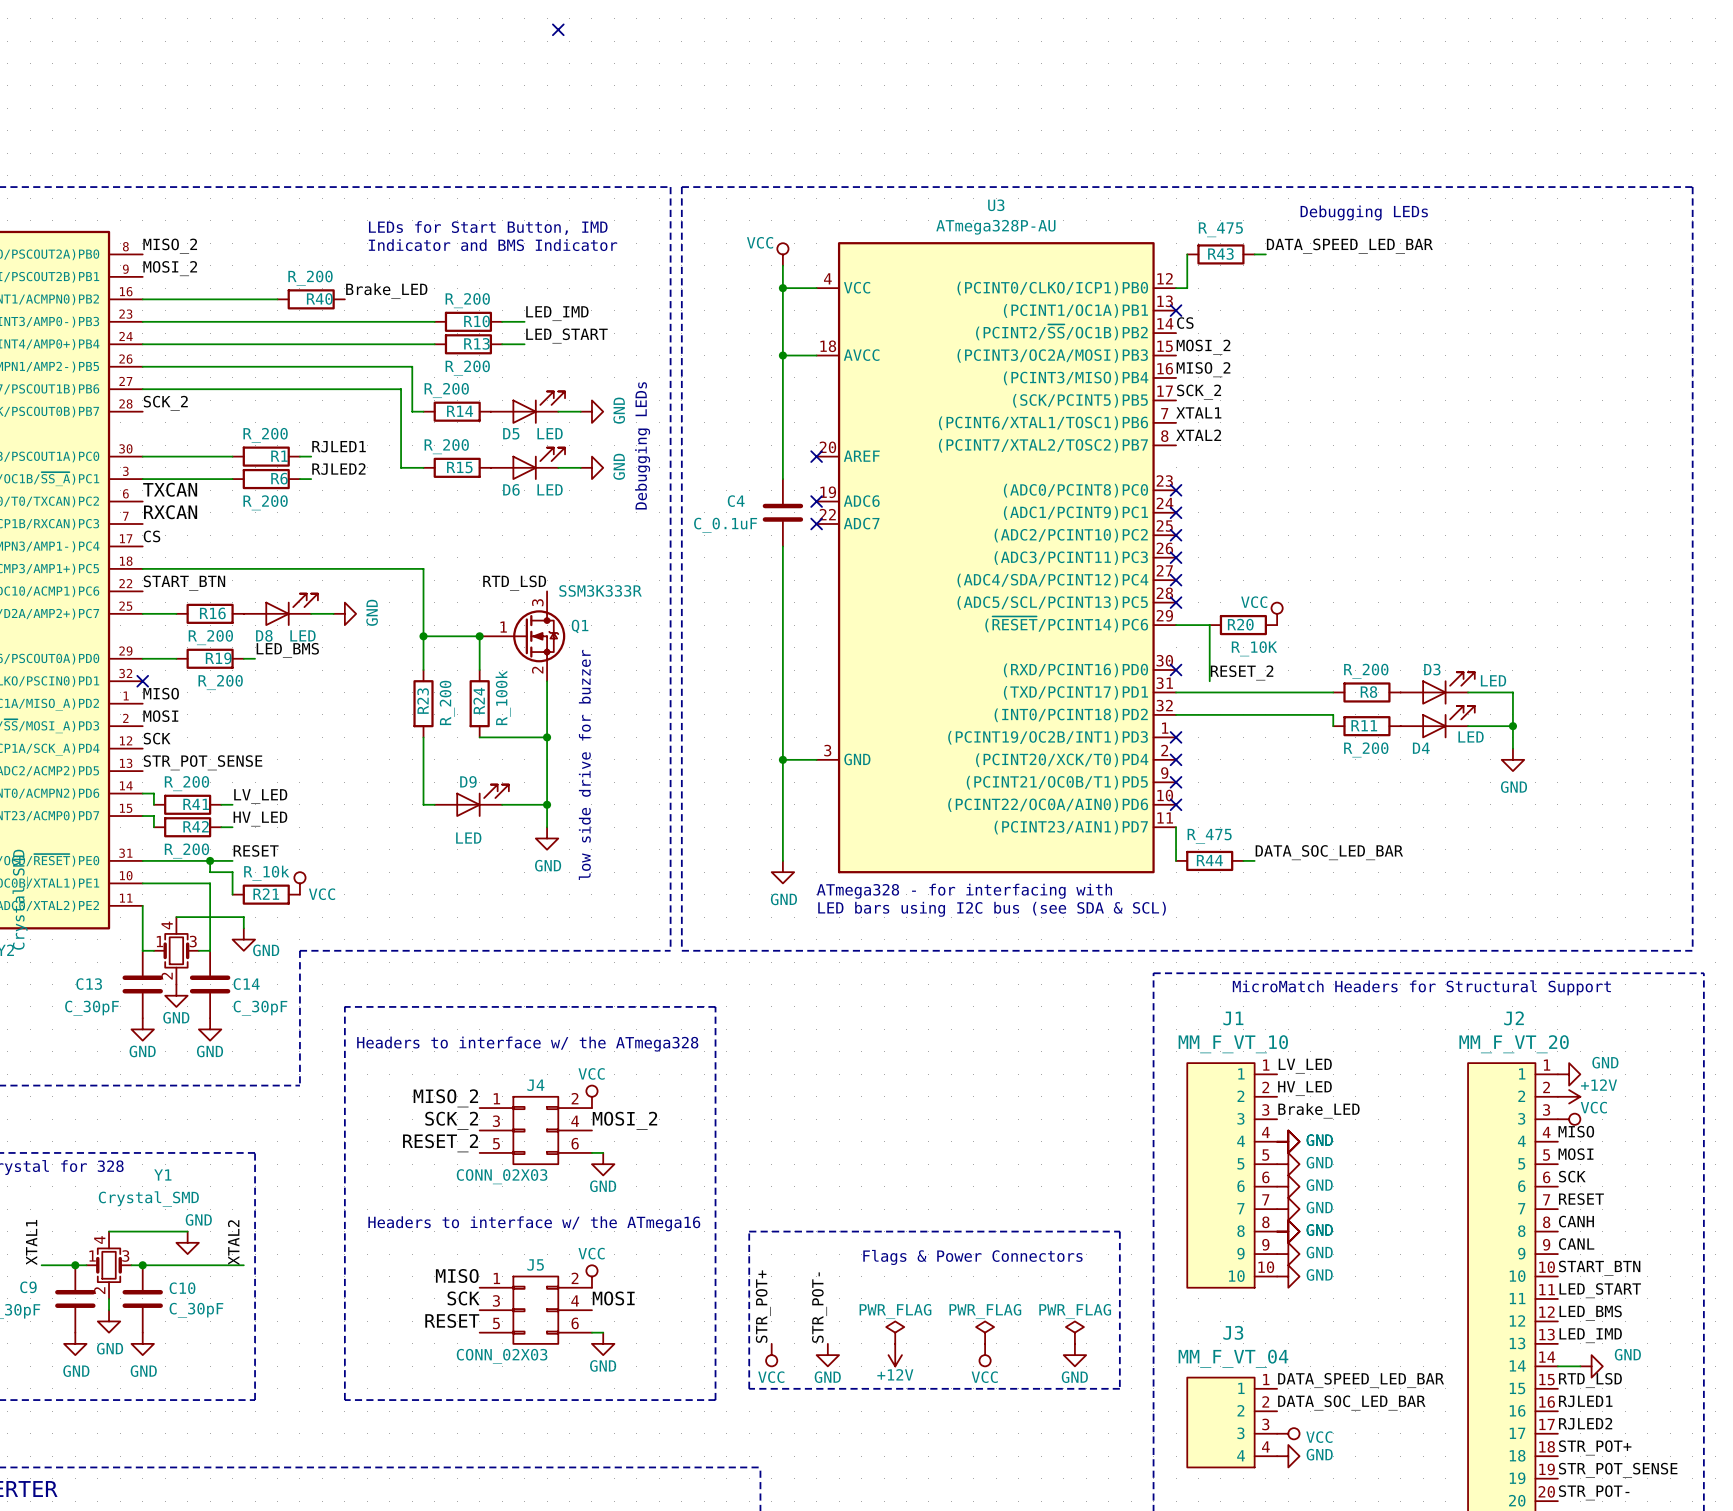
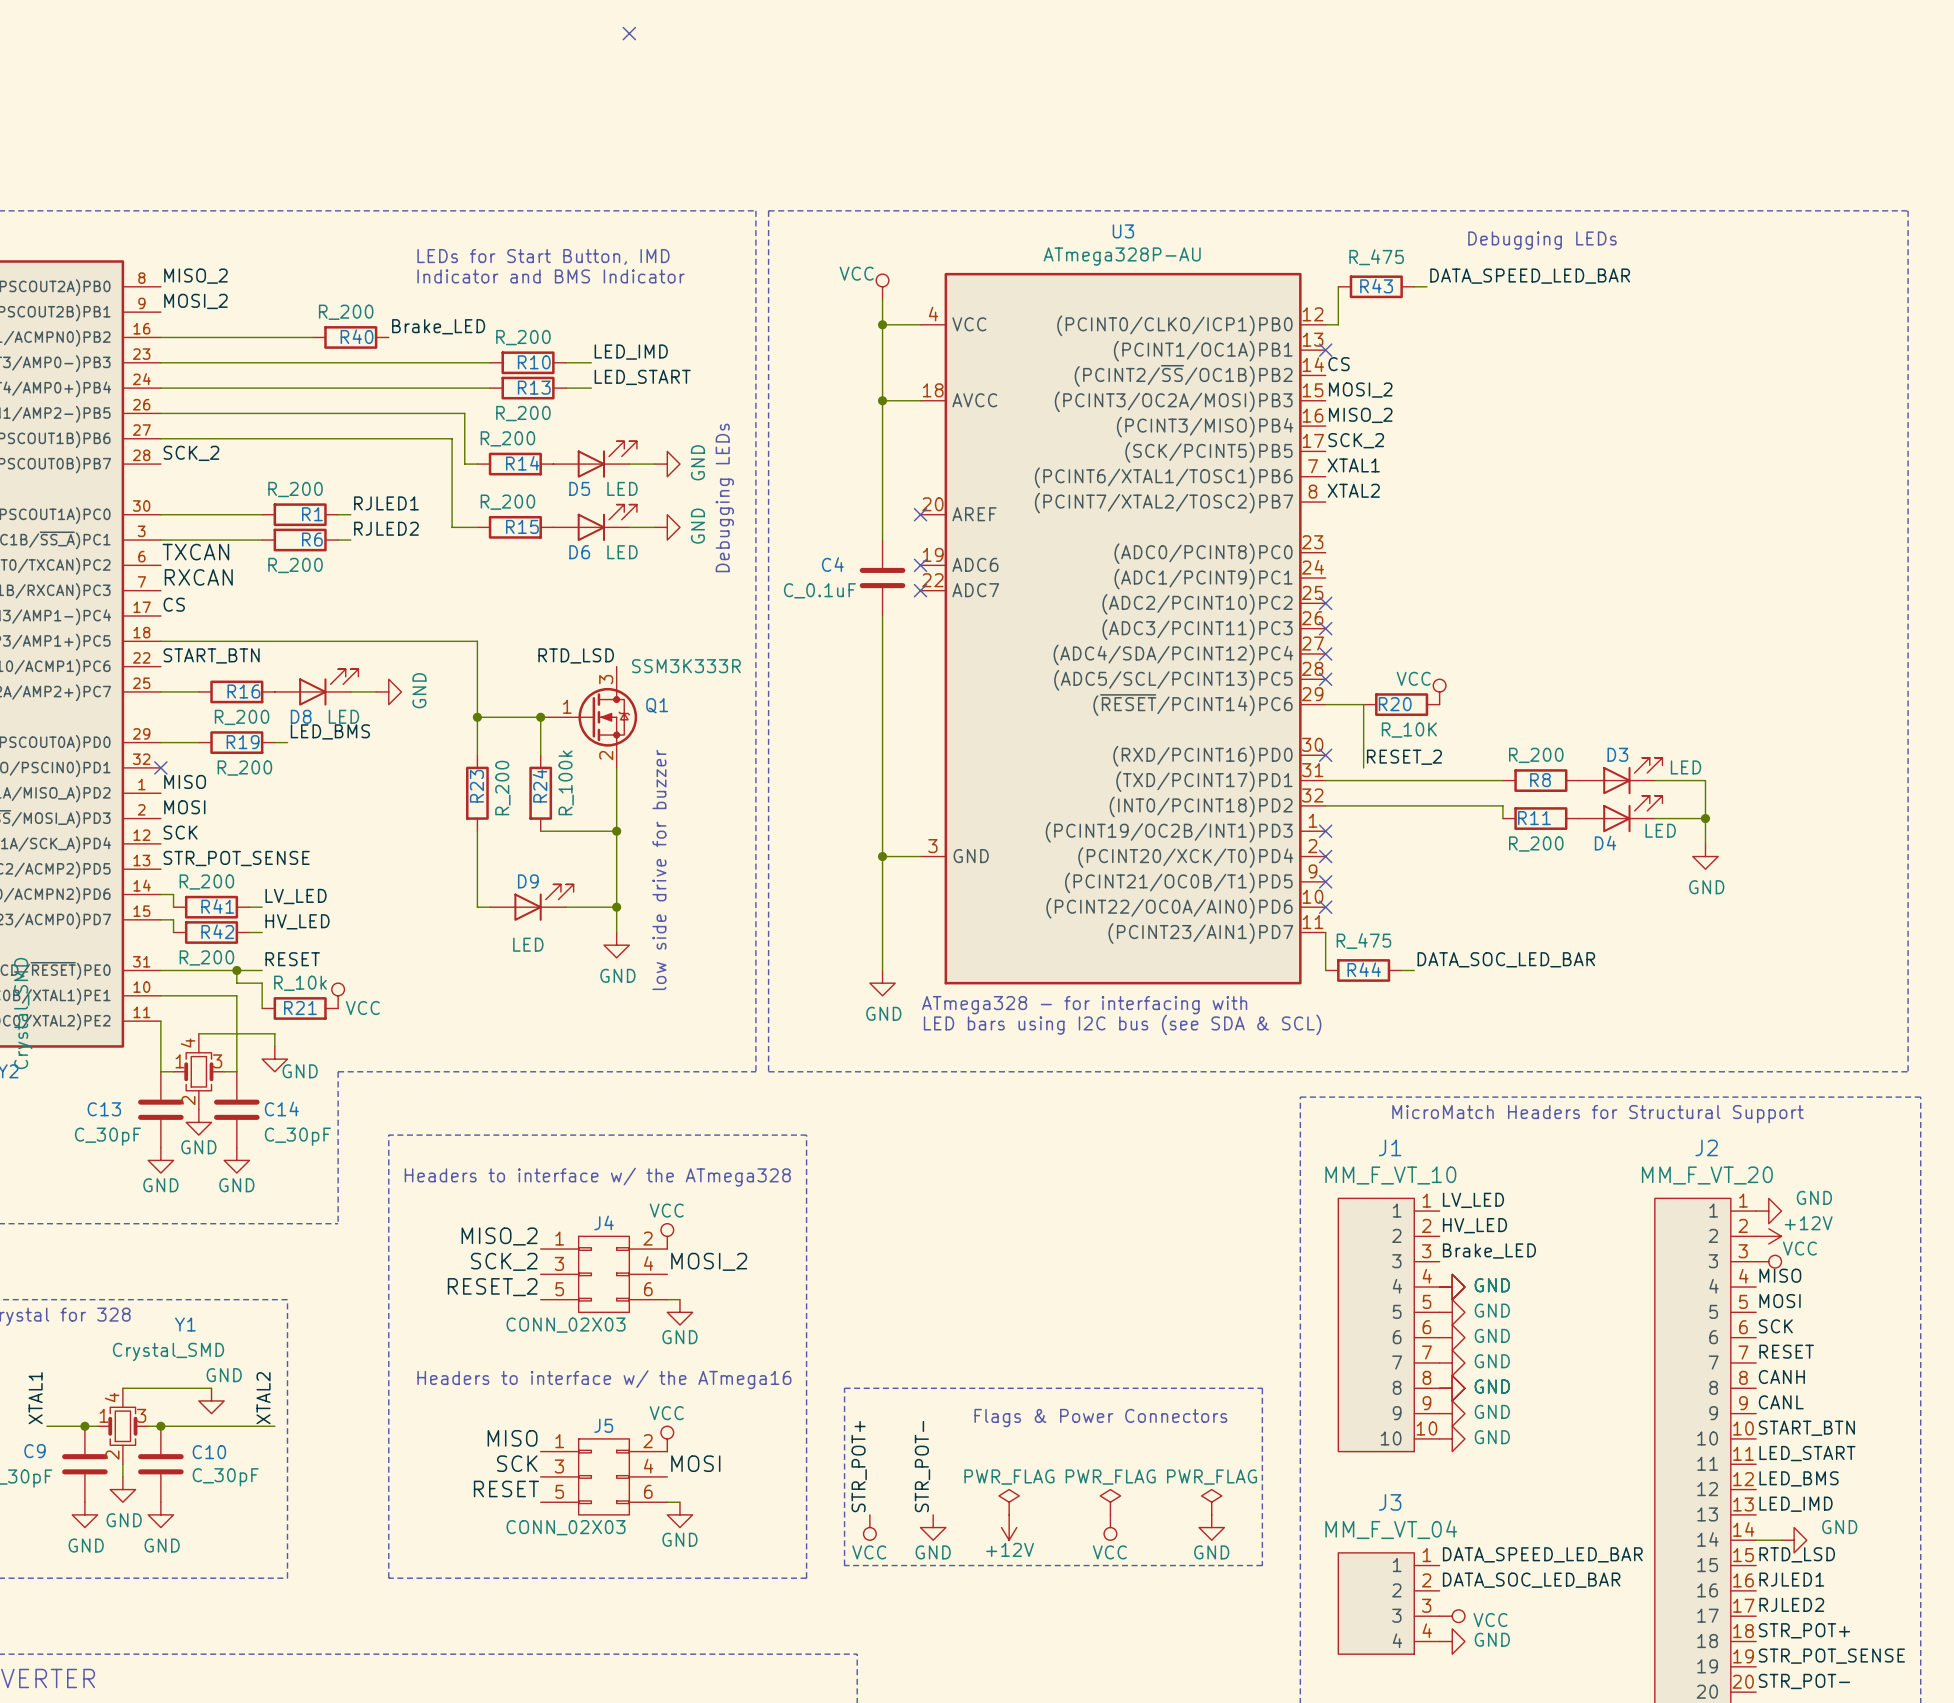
no-connect mark: (1176, 490) -> none
no-connect mark: (1176, 512) -> none

